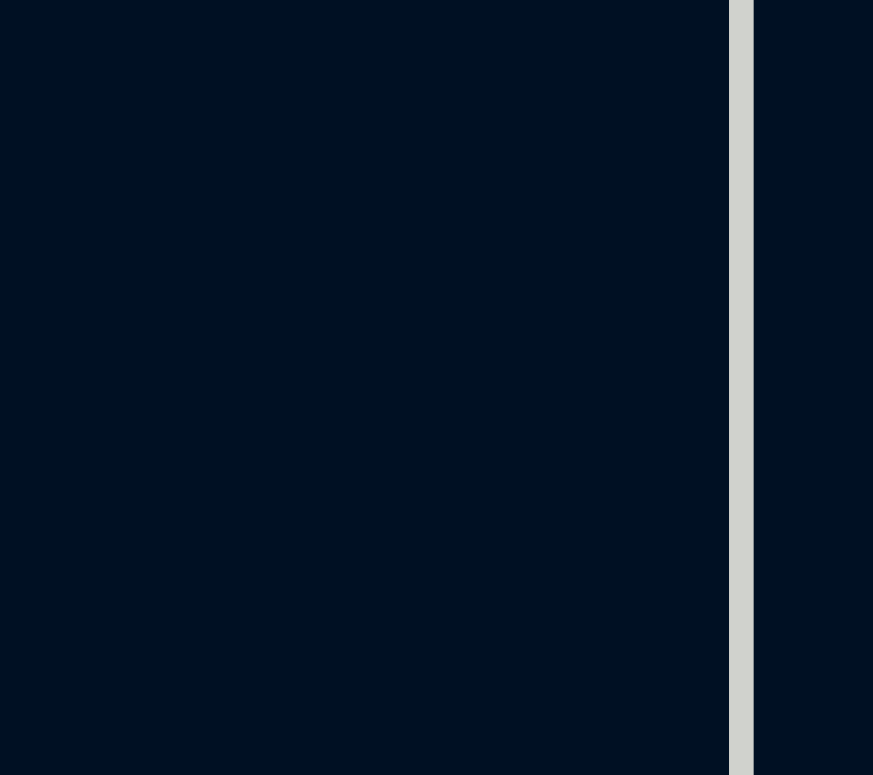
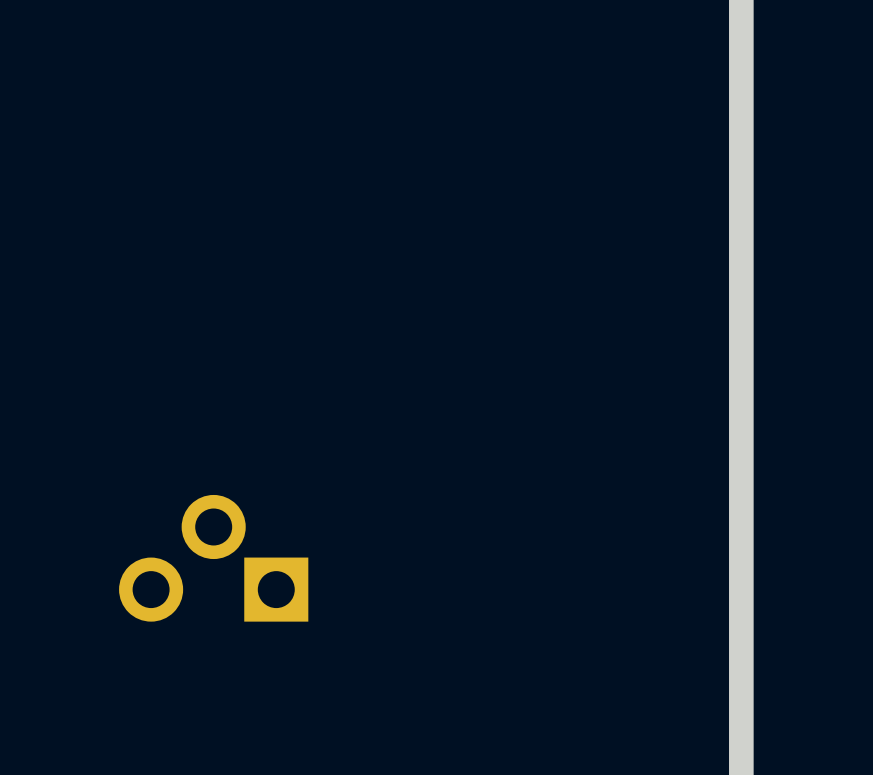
part: none -> (213, 558)

